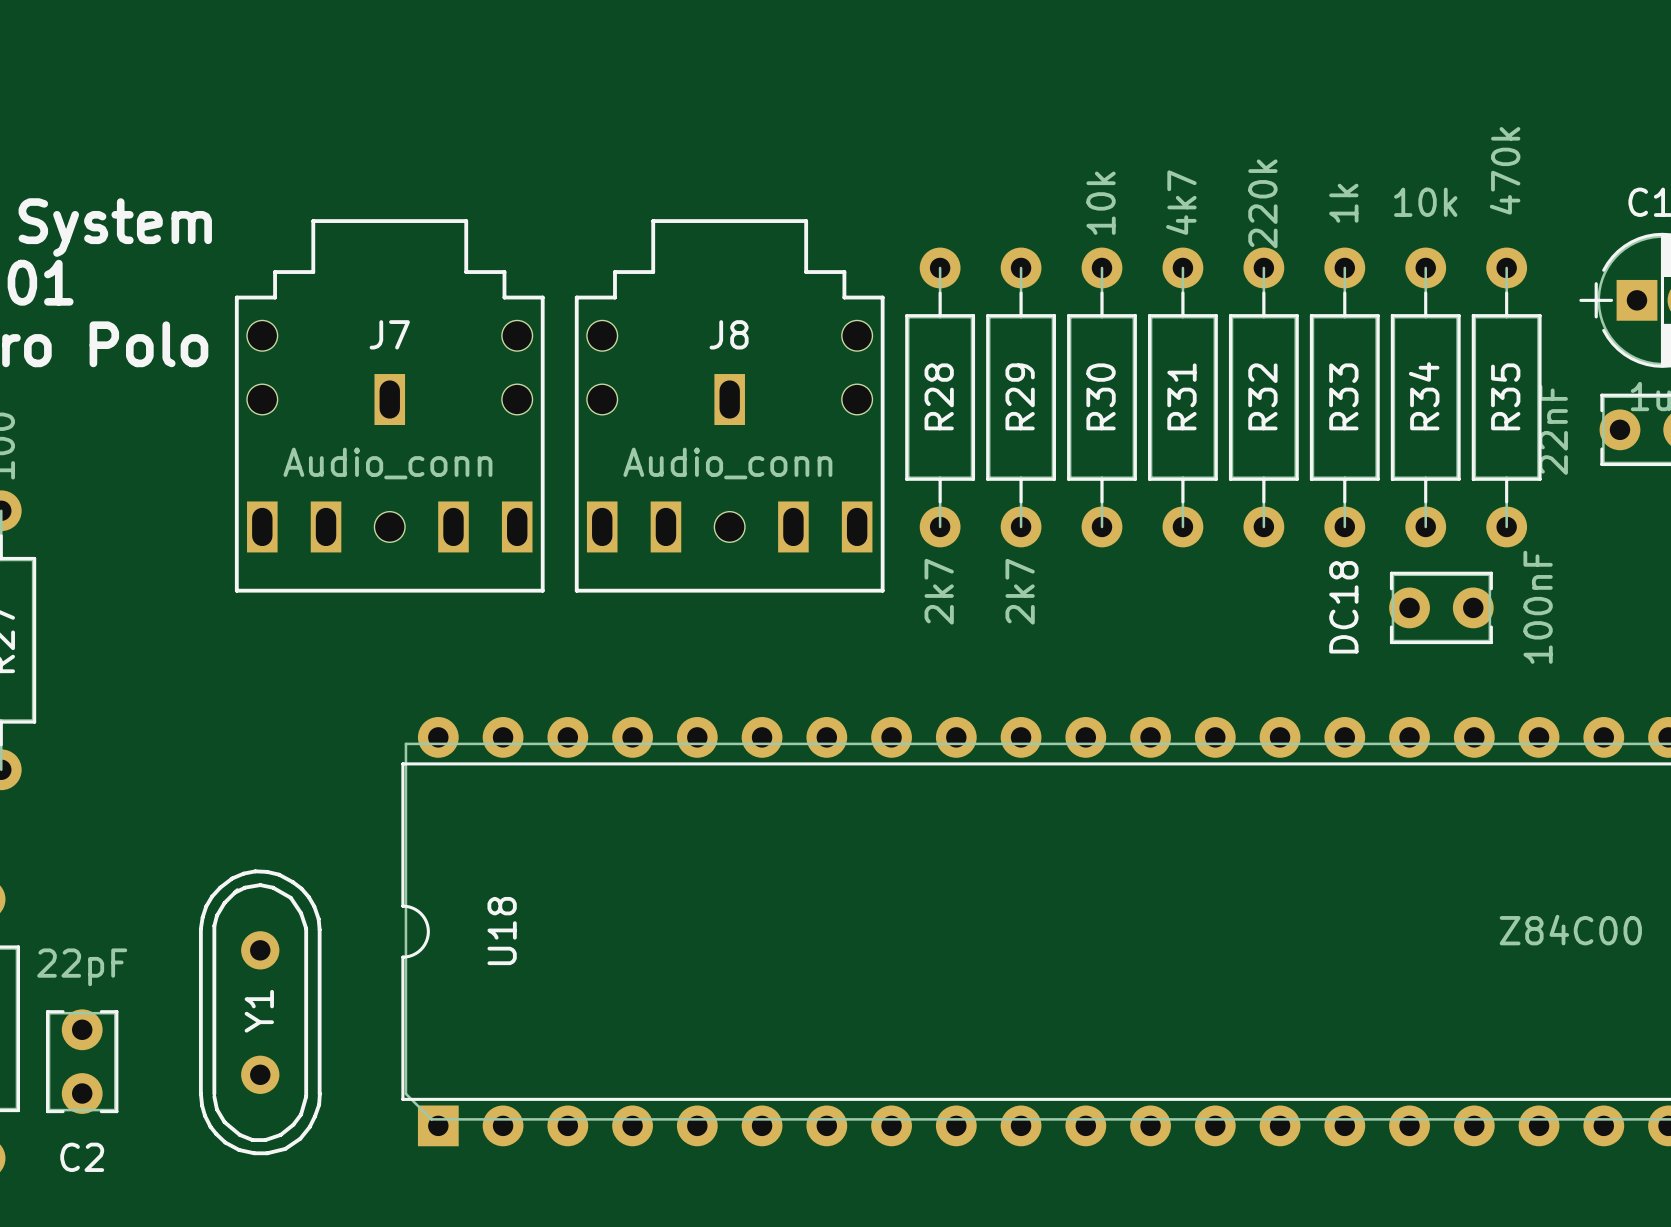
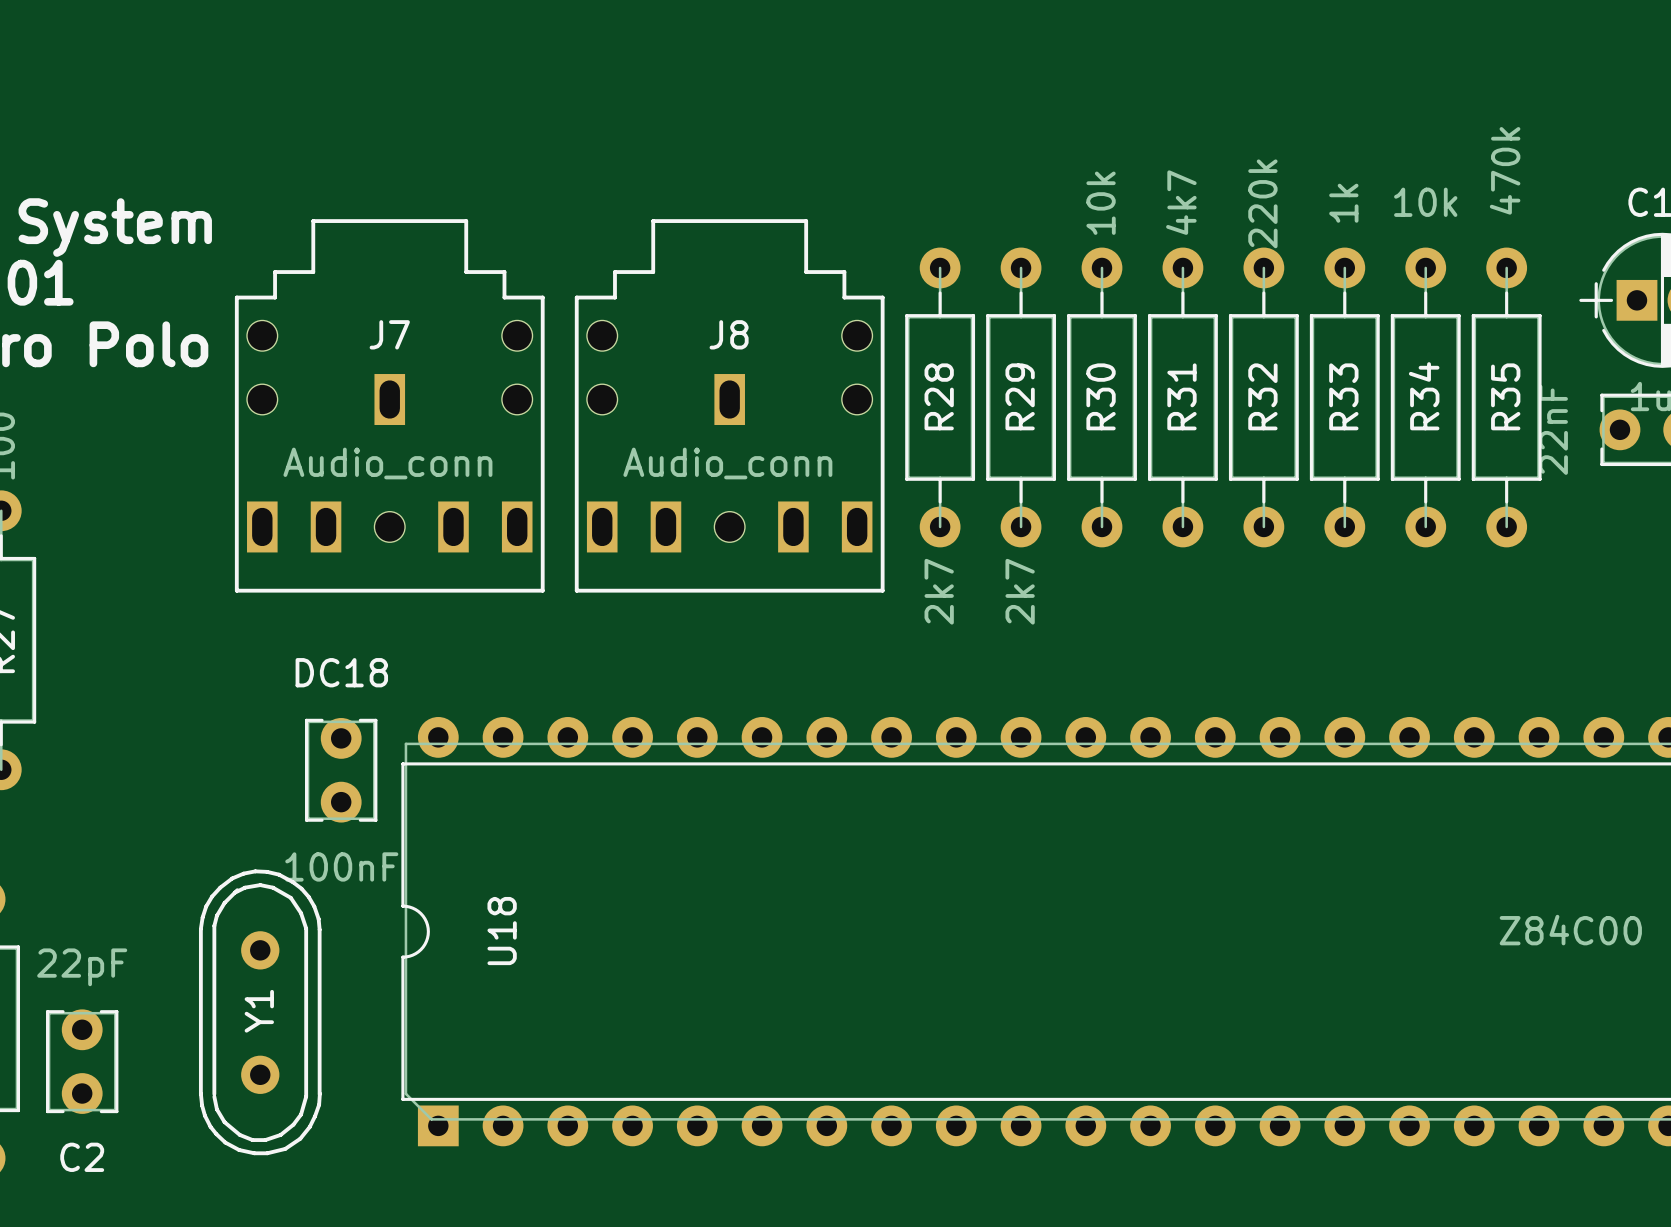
DC18 rotation: 0° (1441, 607) -> 90° clockwise (341, 770)
DC18 position: (1441, 607) -> (341, 770)

